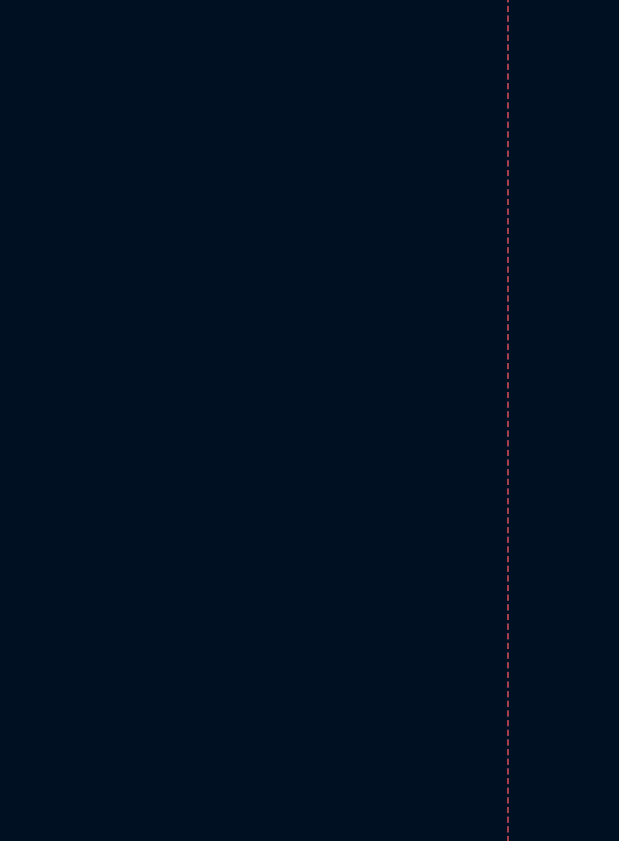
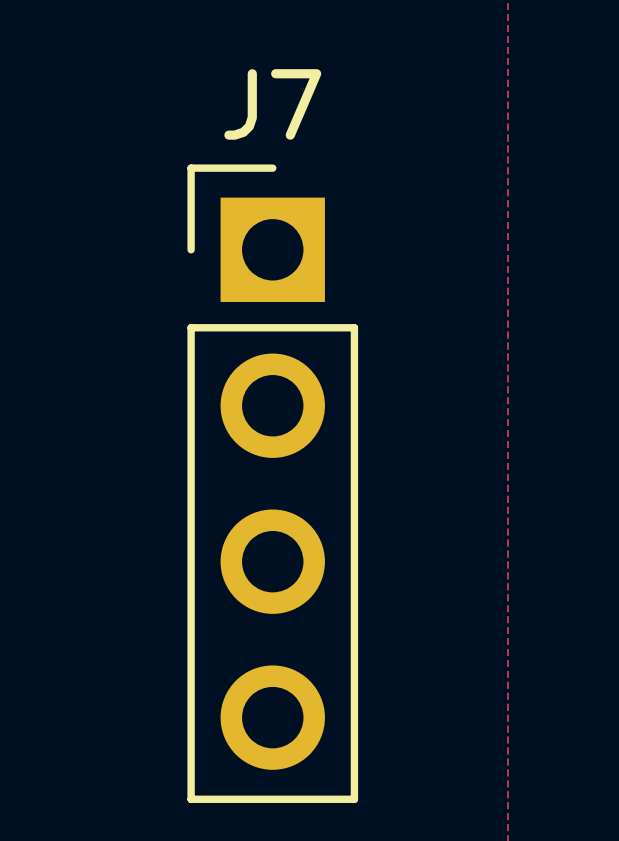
J7: none -> (272, 483)

